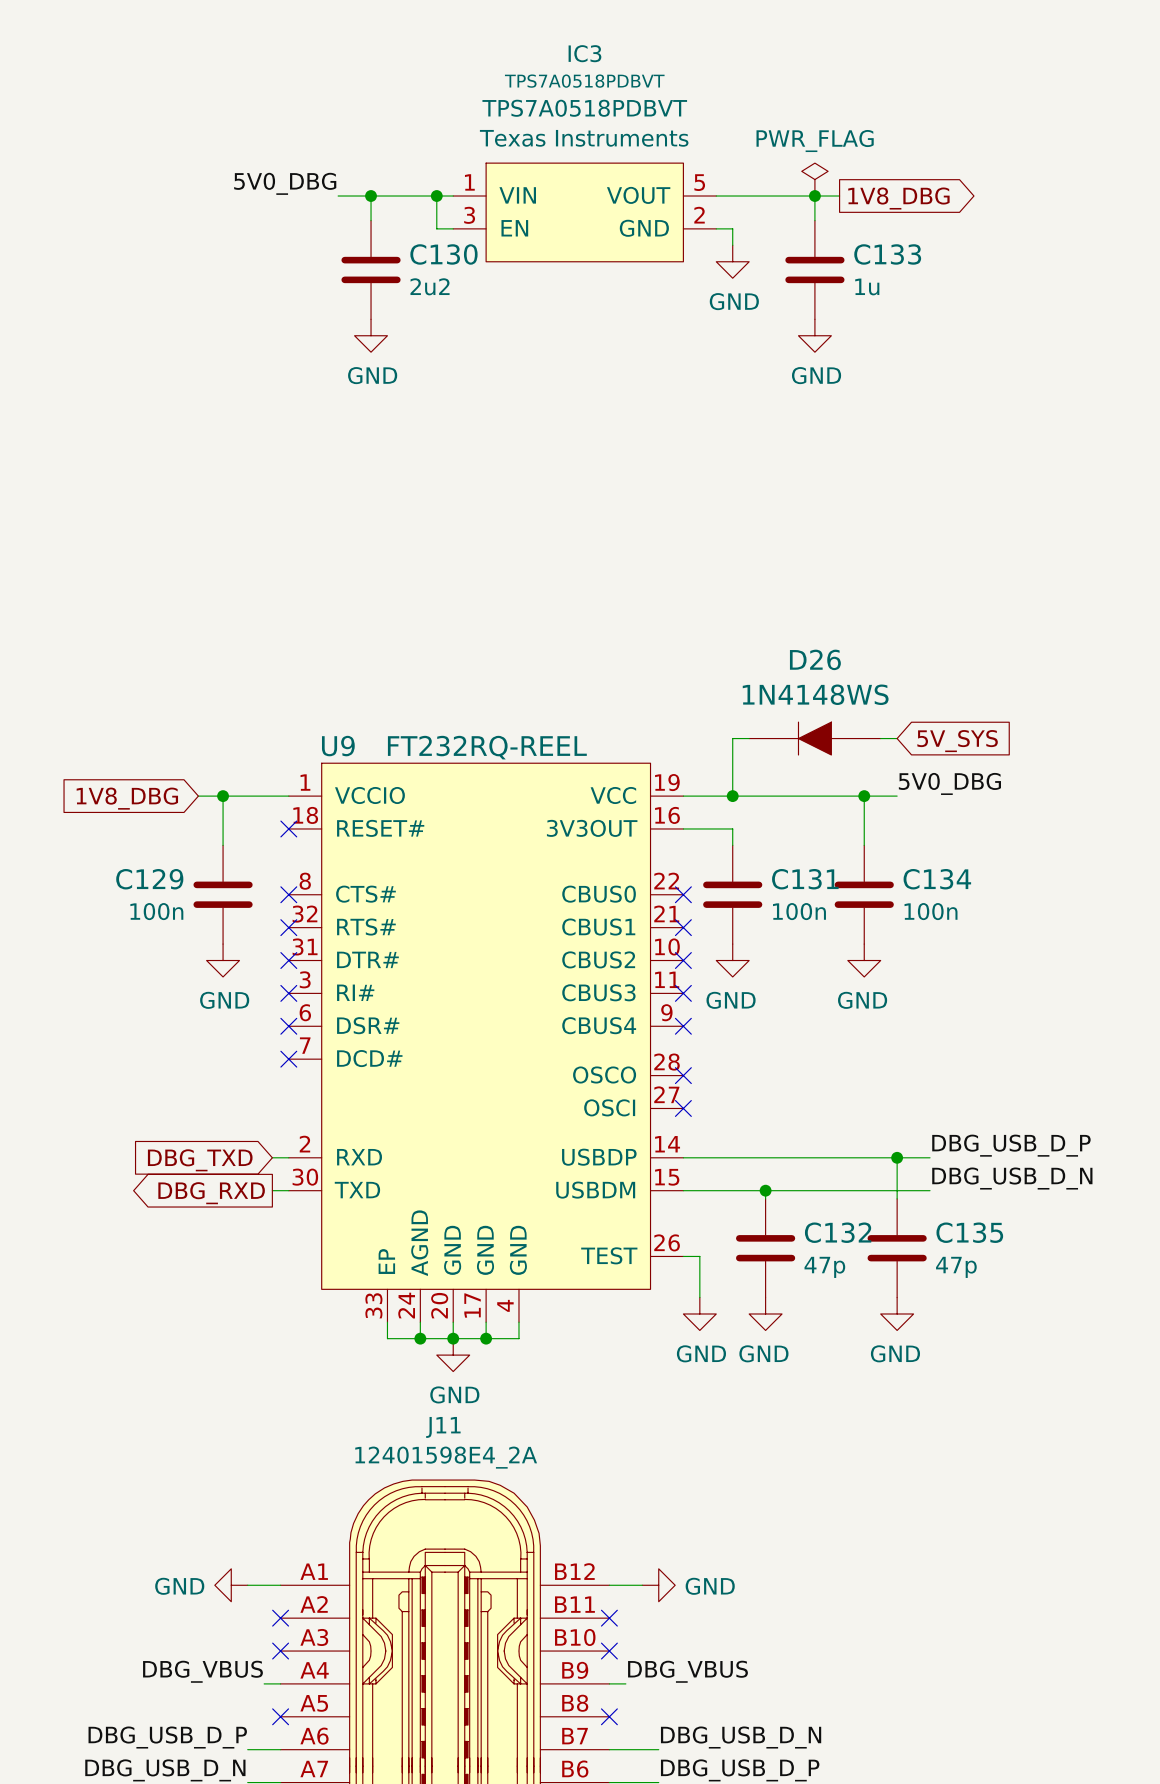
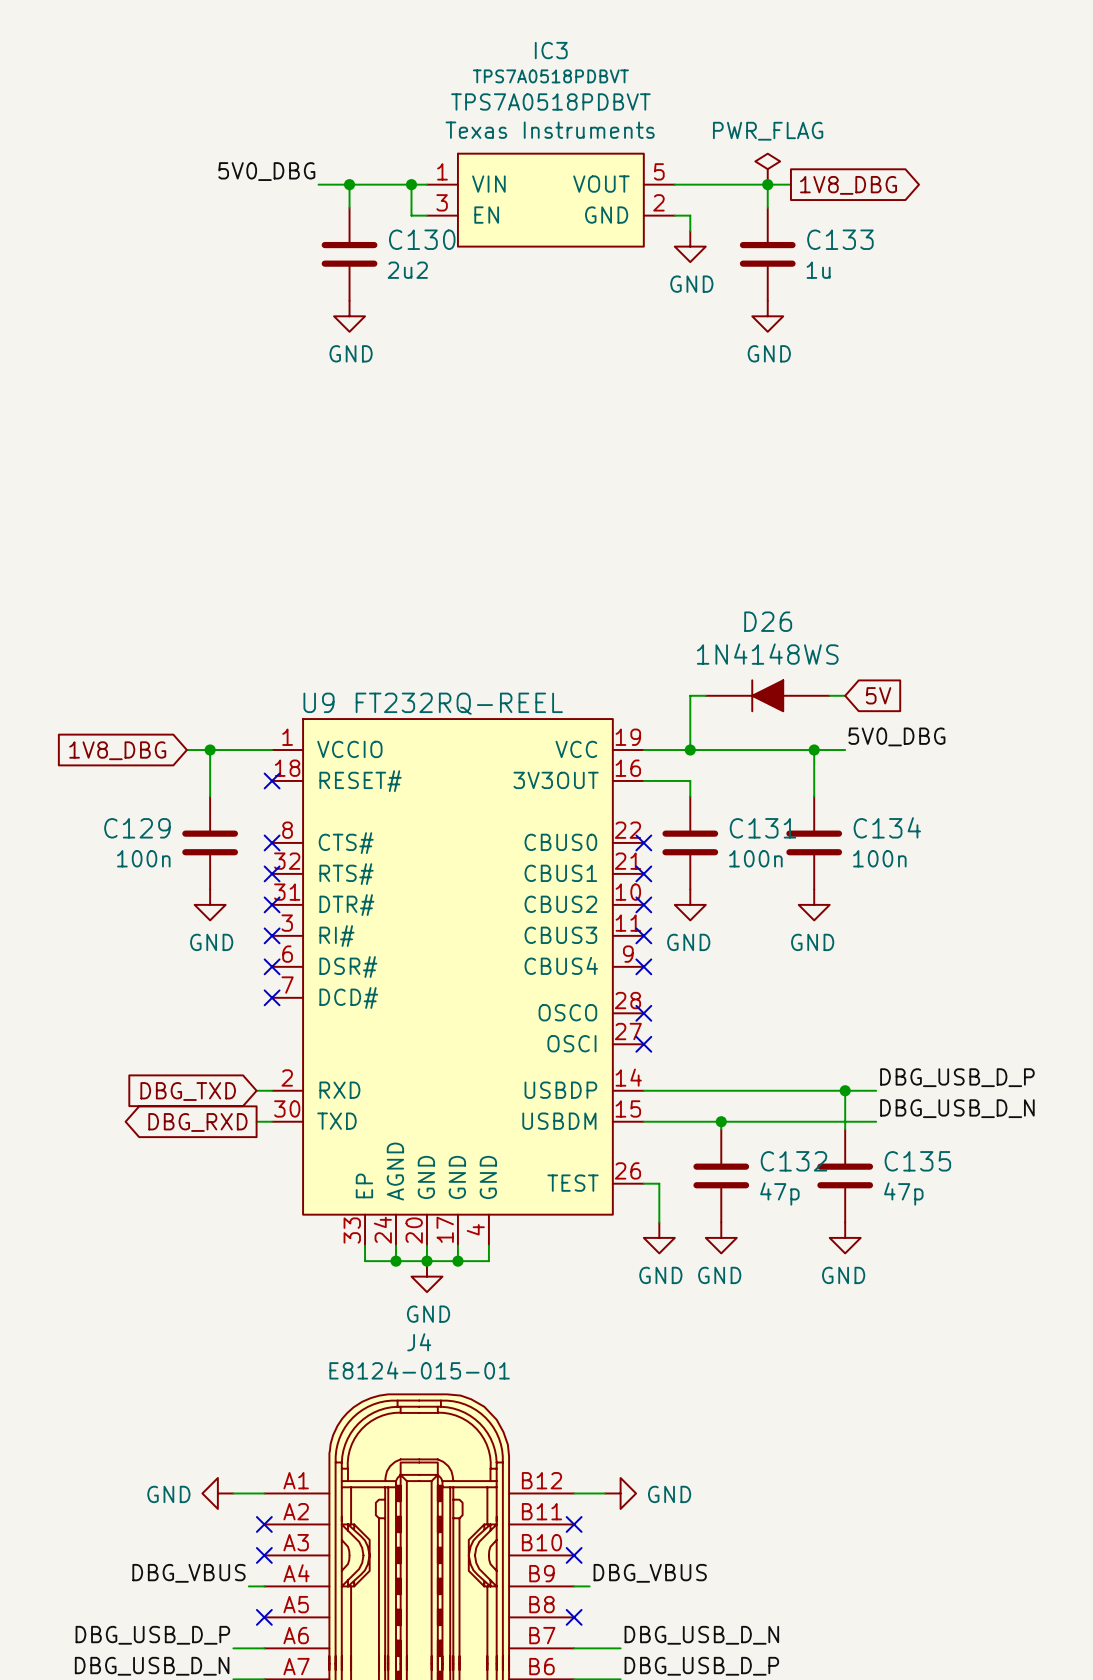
global label: 5V_SYS (957, 741) -> 5V (878, 695)
J11 name: J11 (443, 1427) -> J4 (419, 1342)
J11 value: 12401598E4_2A (446, 1457) -> E8124-015-01 (419, 1370)

